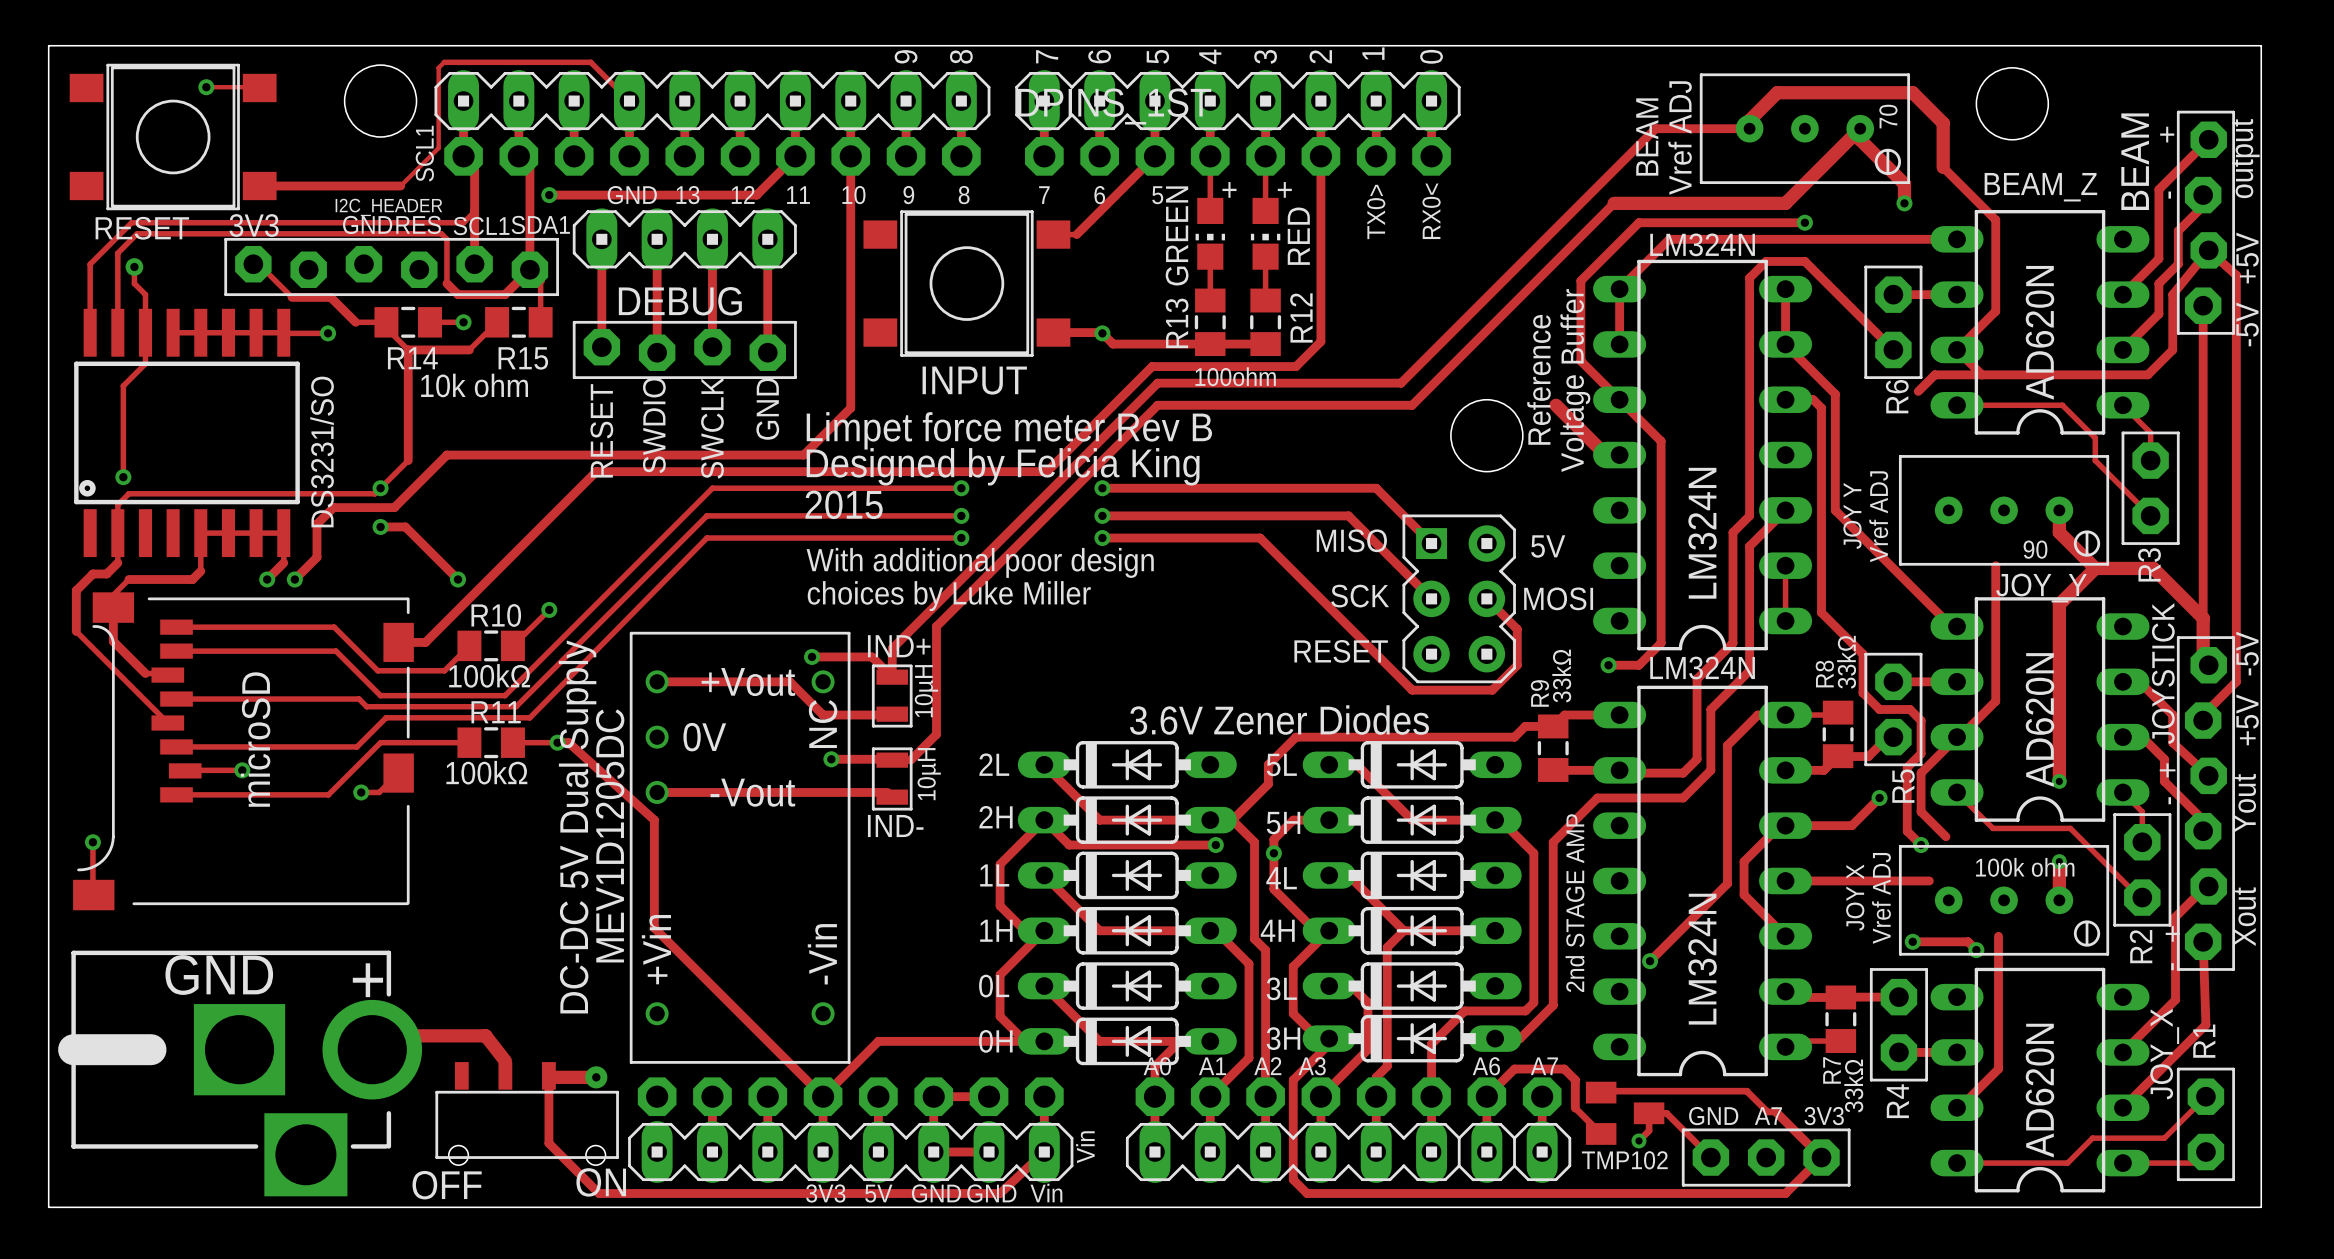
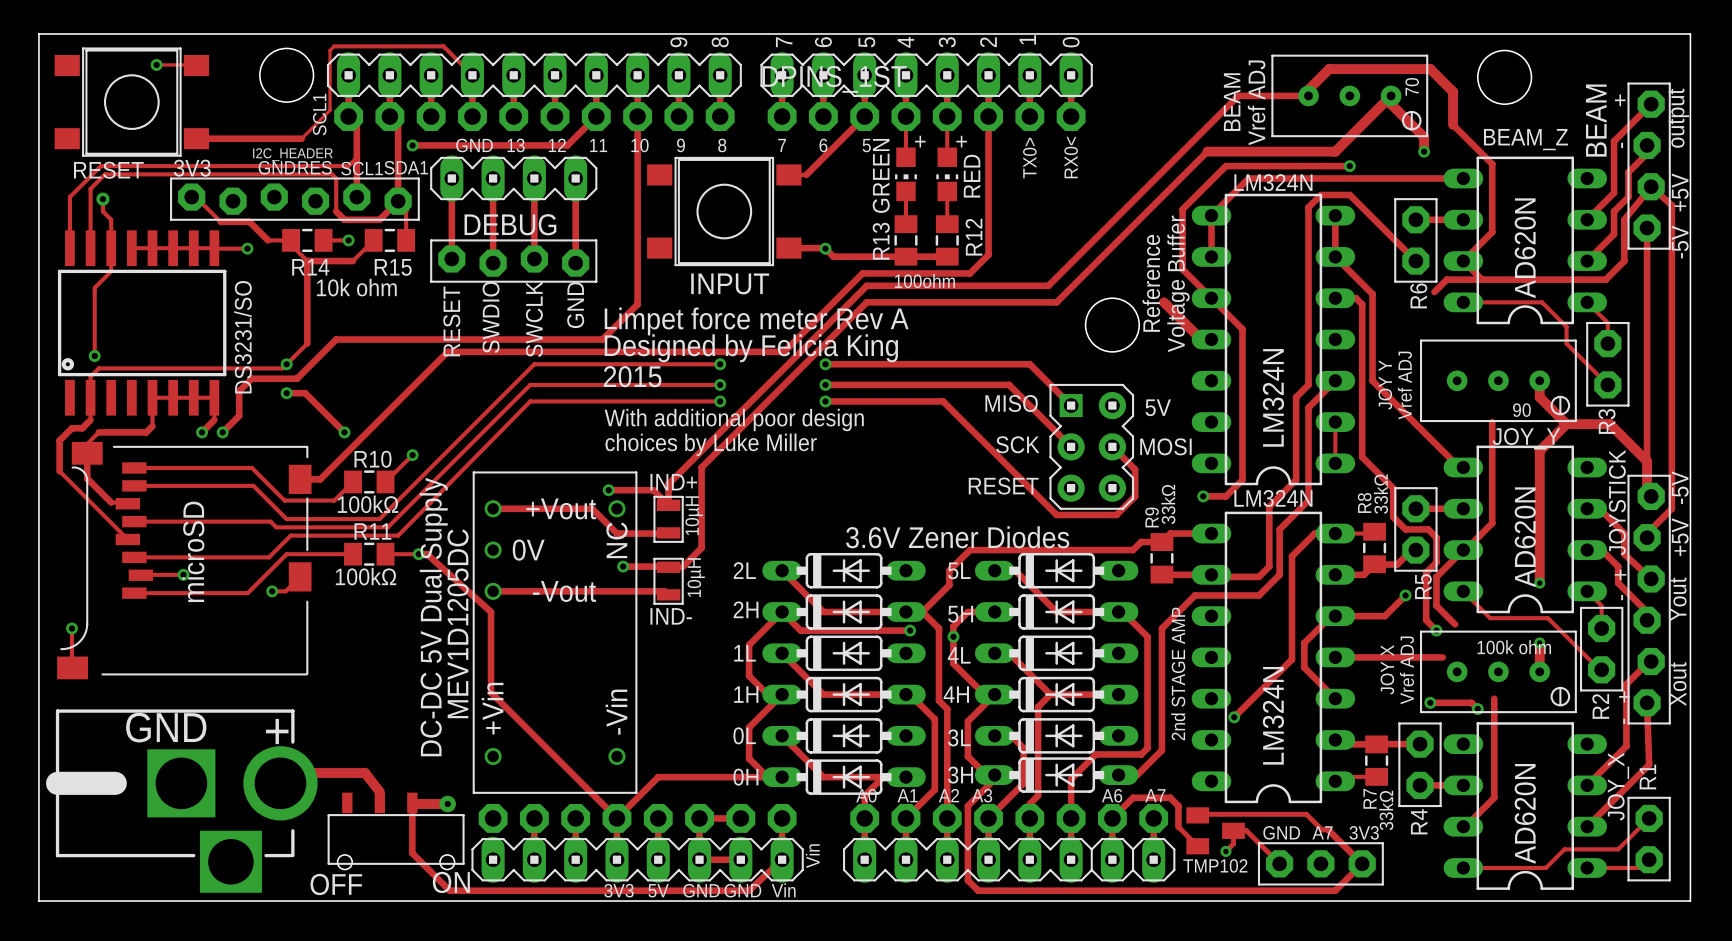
text: Limpet force meter Rev B (1009, 430) -> Limpet force meter Rev A (756, 321)

